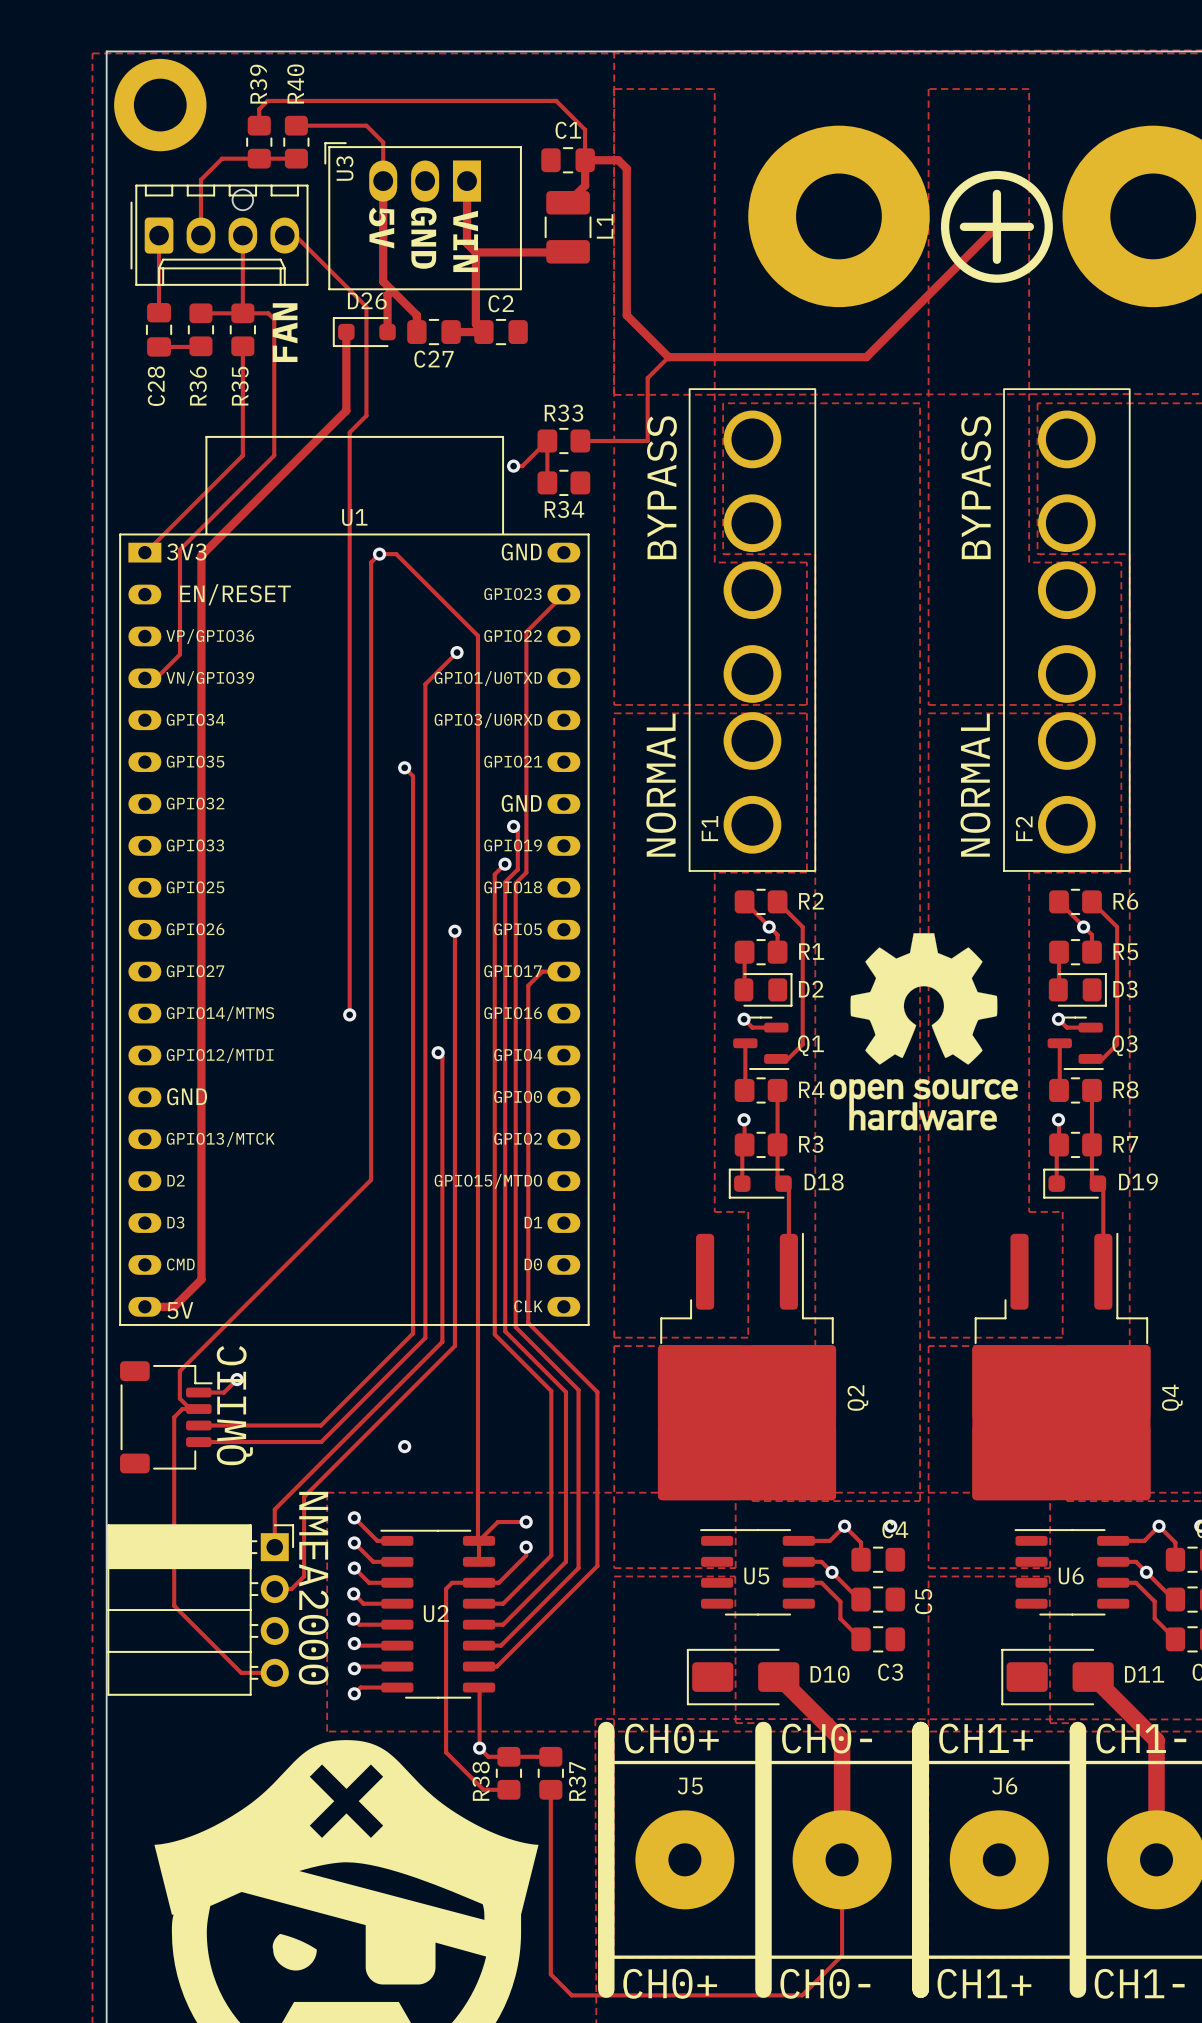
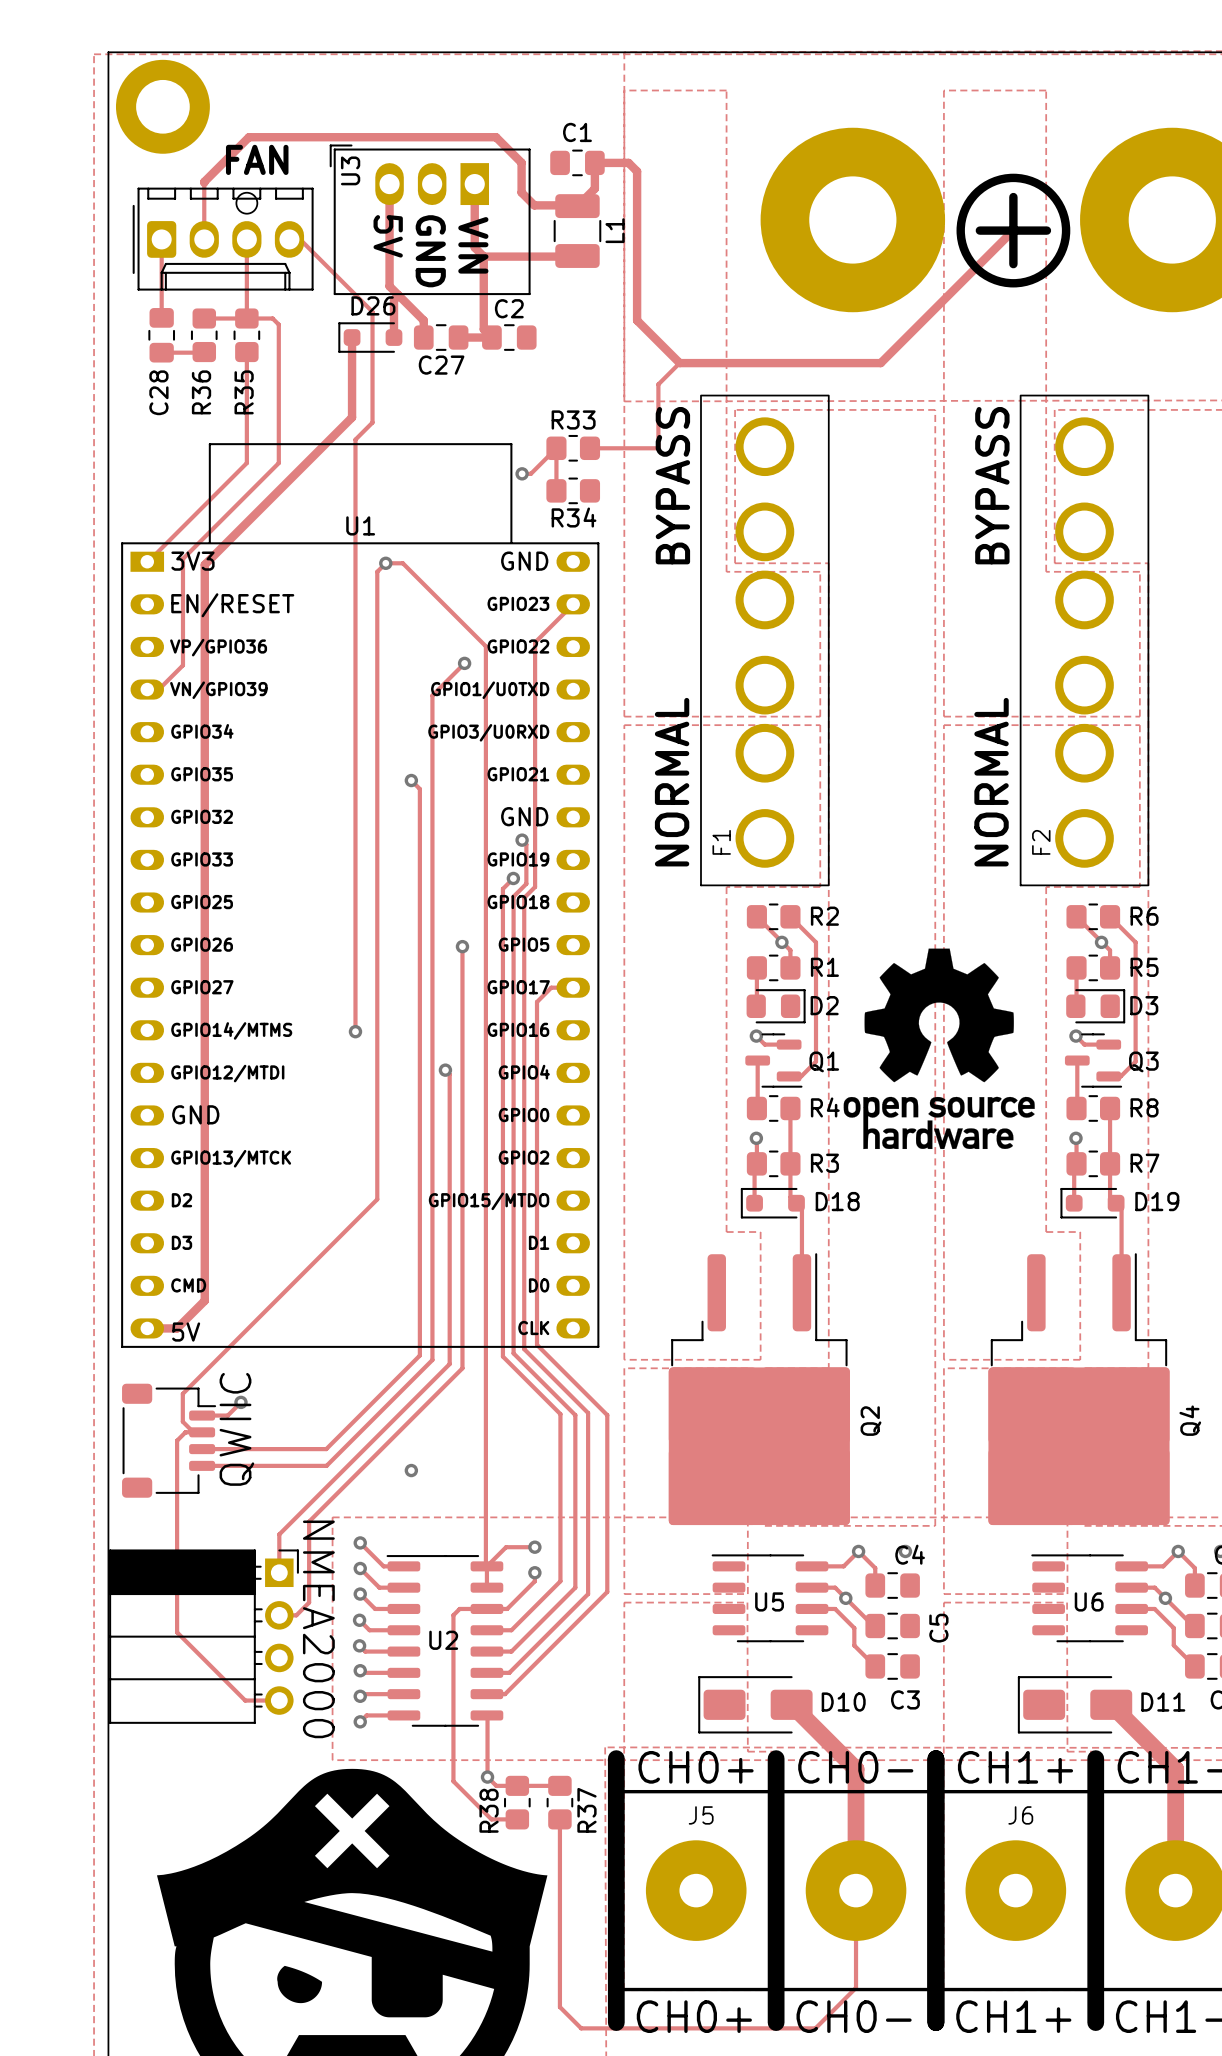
track: (259, 125) (259, 109) (267, 100) (556, 100) (585, 129) (585, 160) -> none
track: (296, 125) (366, 125) (383, 142) (383, 181) -> none
R39: (259, 142) -> none
R40: (296, 142) -> none
track: (296, 158) (222, 158) (200, 179) -> (577, 206) (534, 205) (521, 192) (521, 162) (496, 137) (249, 137) (204, 182)
text rotation: 0° (285, 332) -> 90° clockwise (257, 159)
text position: FAN (285, 332) -> FAN (257, 159)

